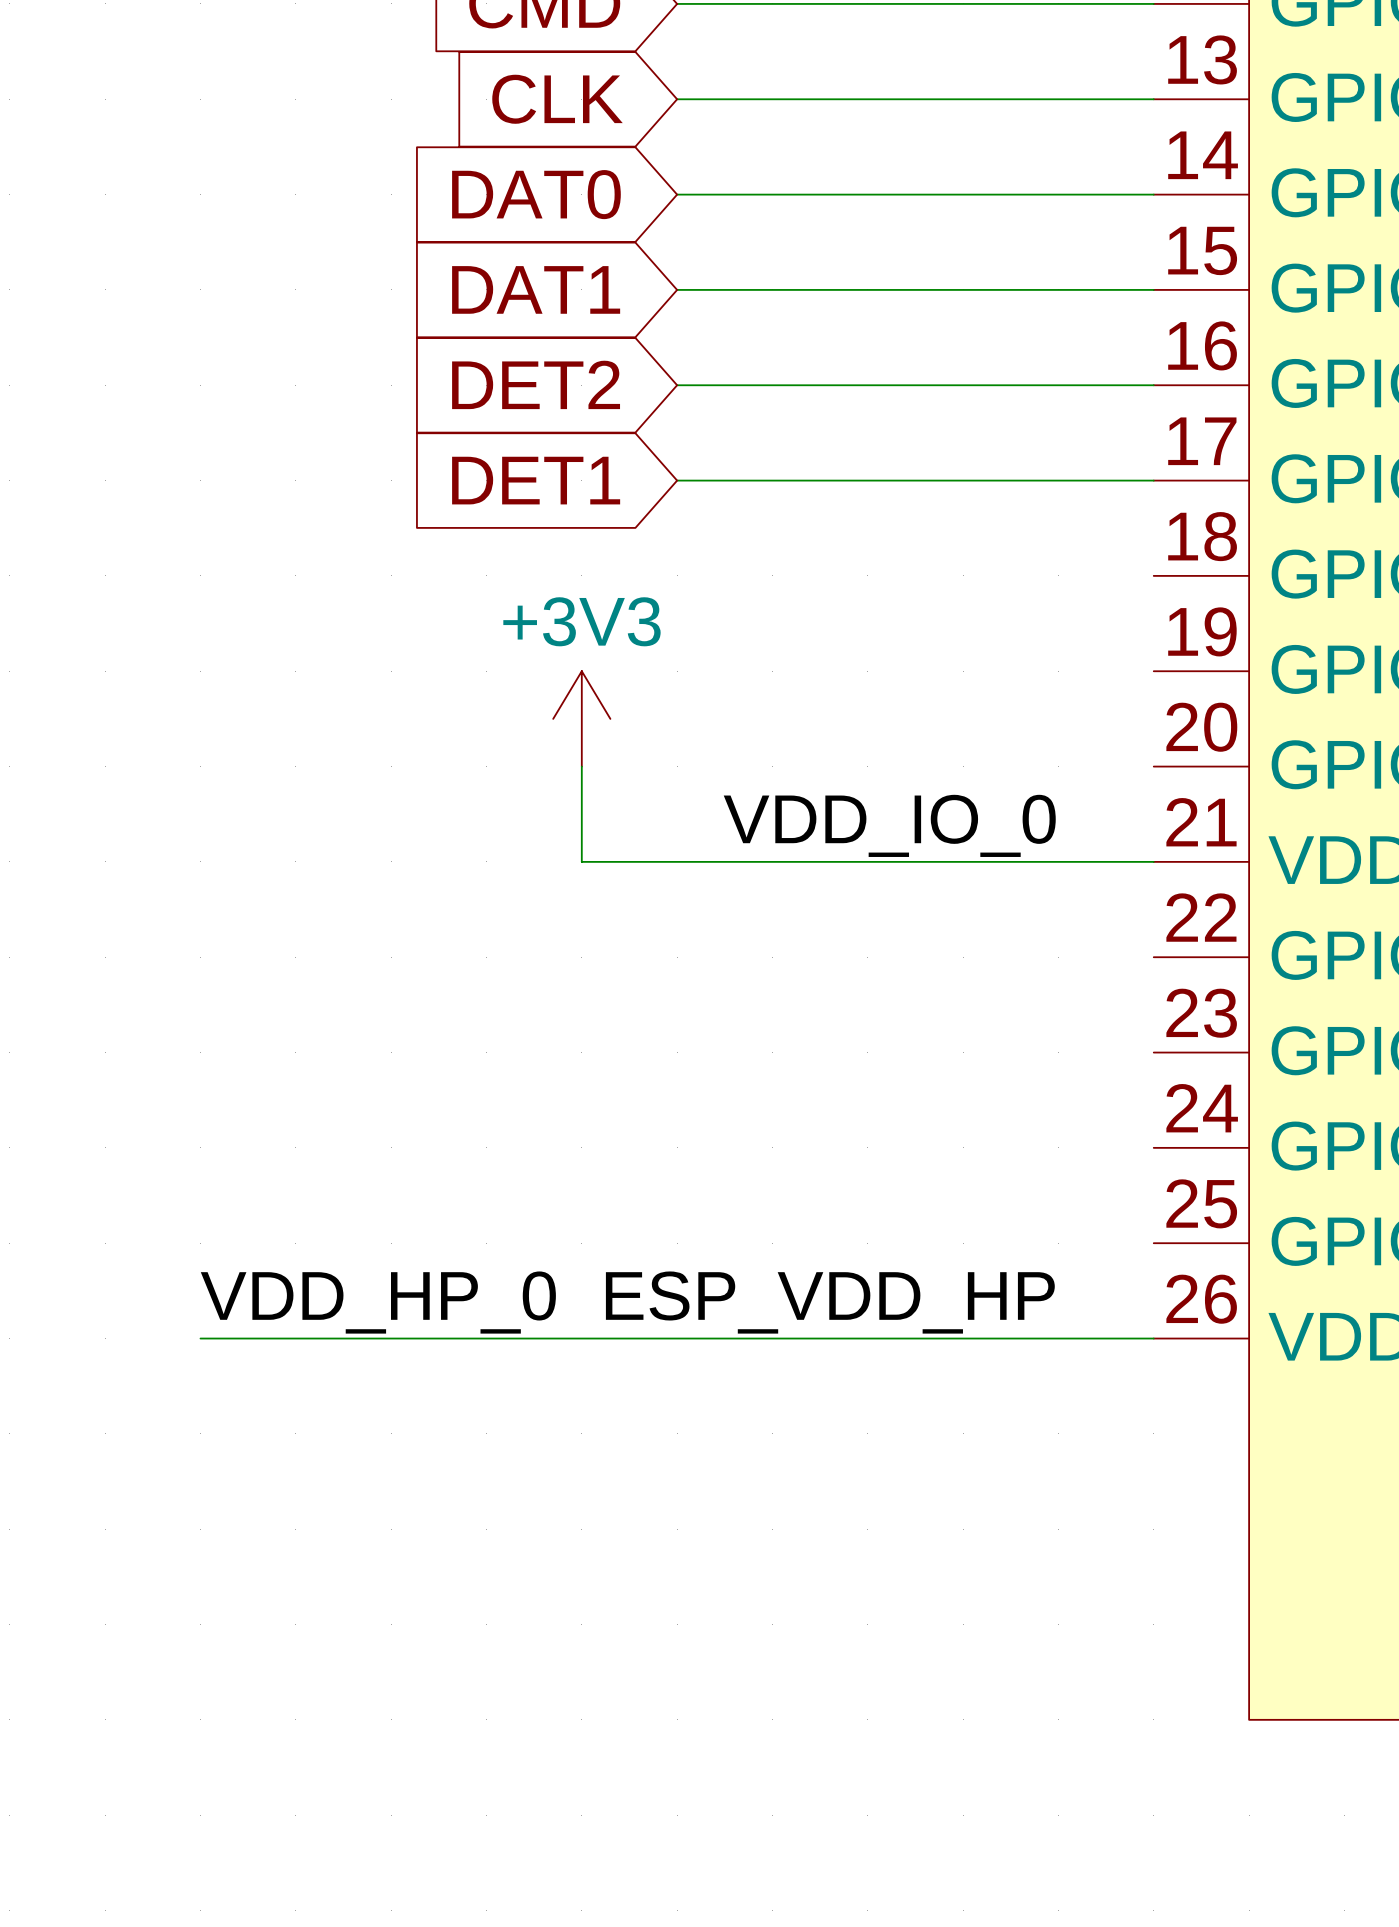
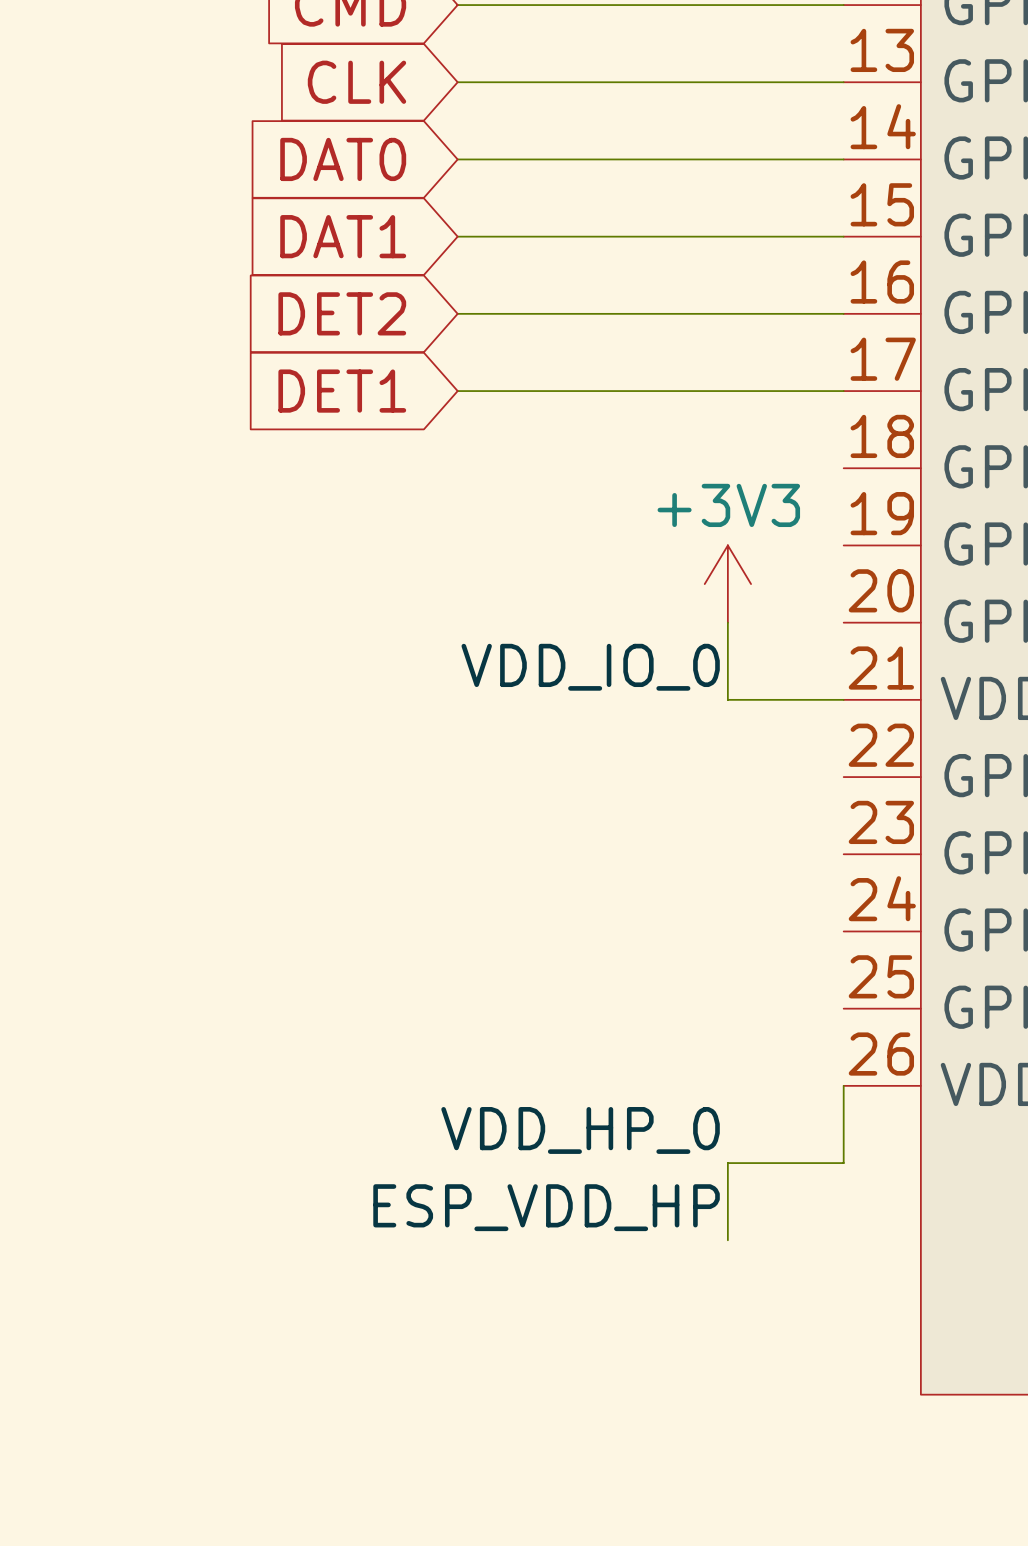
power symbol position: +3V3 (581, 718) -> +3V3 (727, 584)
wire: (581, 766) (581, 861) (1010, 861) -> (727, 622) (727, 699)
label position: VDD_IO_0 (889, 825) -> VDD_IO_0 (590, 667)
label position: VDD_HP_0 (378, 1302) -> VDD_HP_0 (580, 1130)
label position: ESP_VDD_HP (830, 1302) -> ESP_VDD_HP (546, 1207)
wire: (200, 1338) (1153, 1338) -> (727, 1240) (727, 1163) (843, 1163) (843, 1085)

